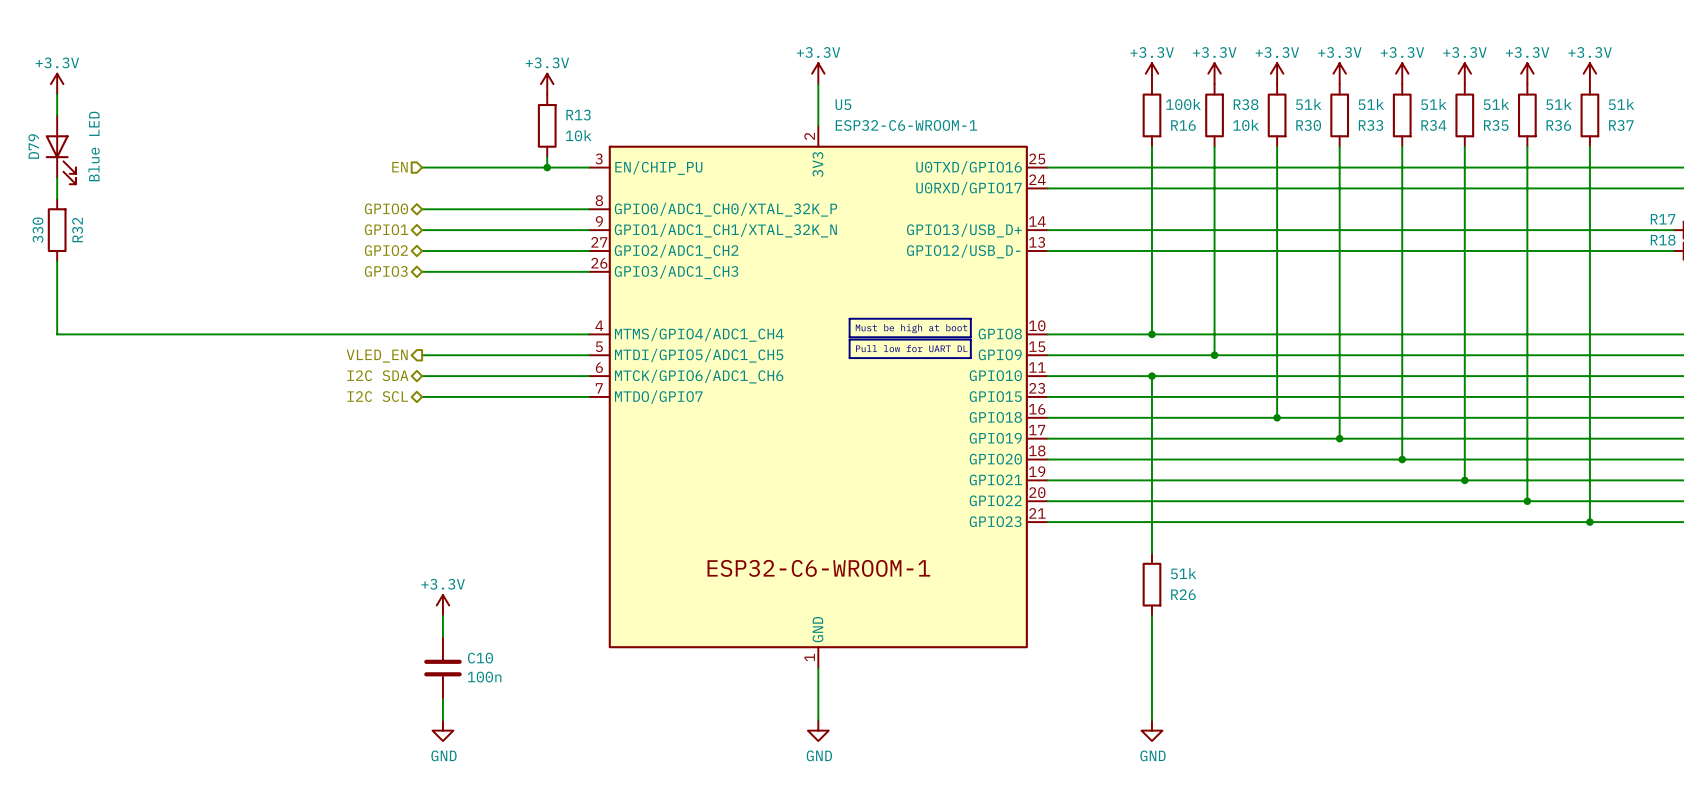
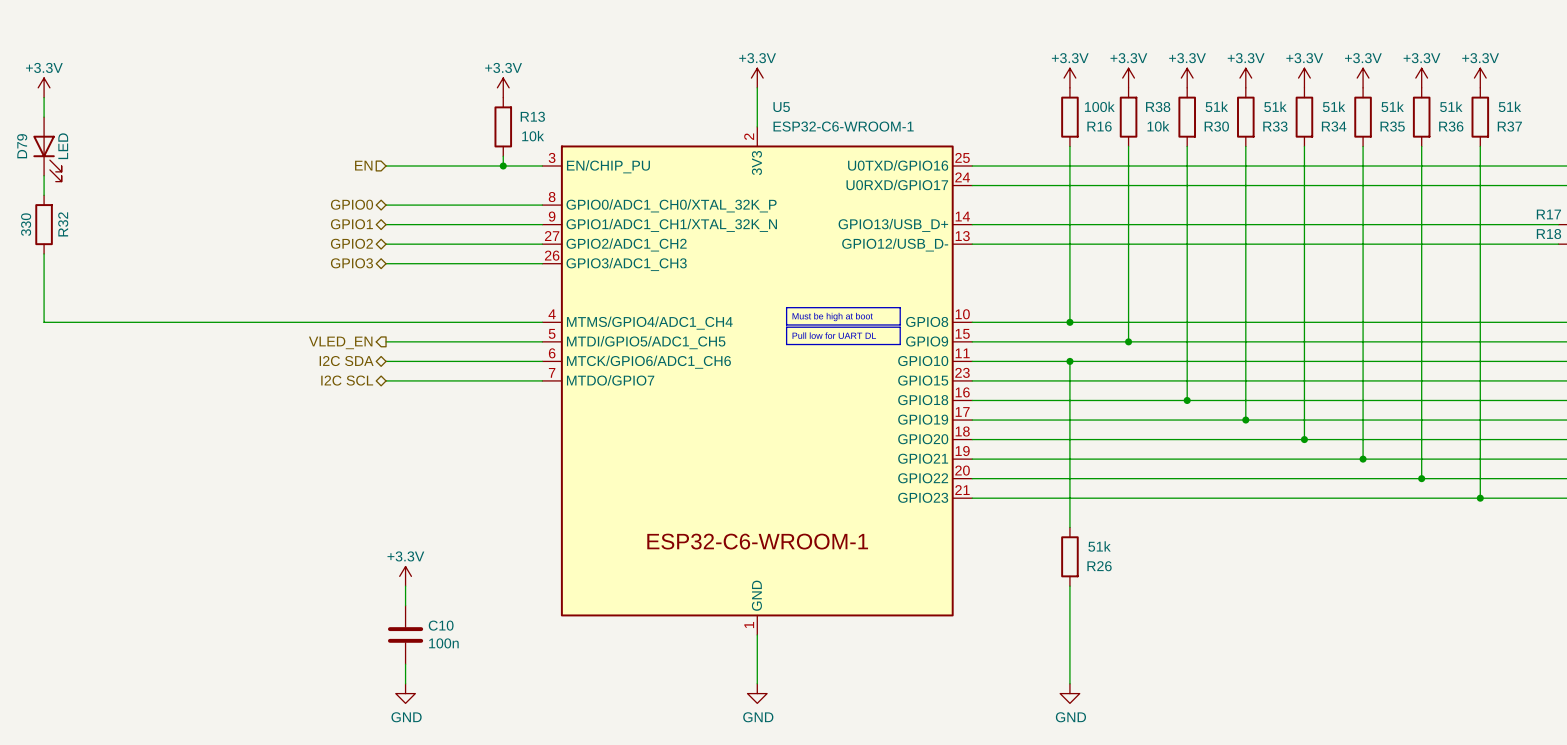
D79 value: Blue LED (94, 146) -> LED (63, 146)

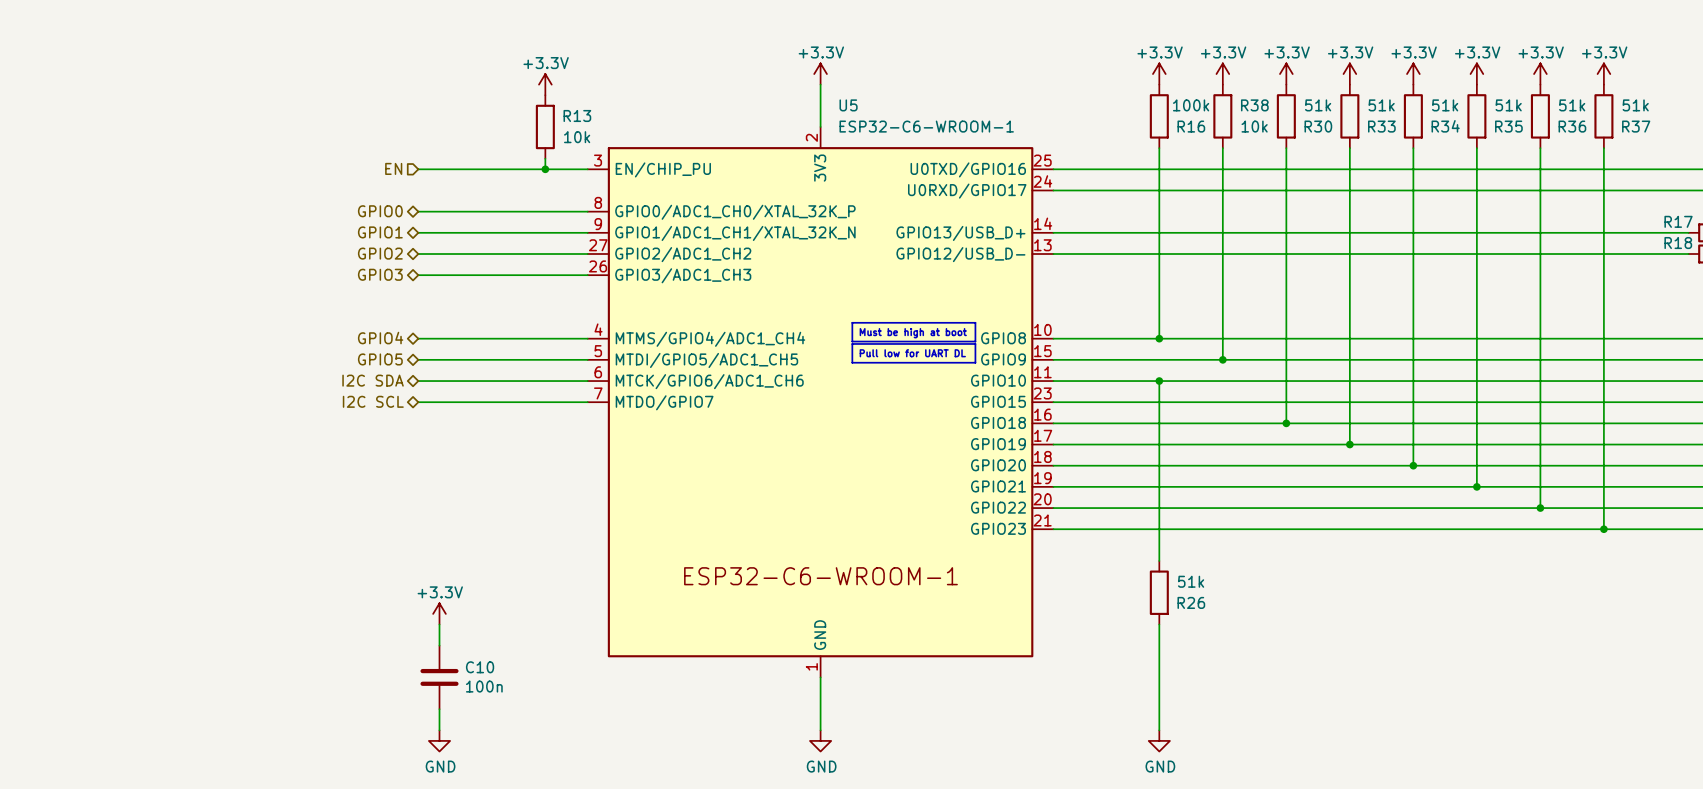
power symbol: +3.3V (44, 87) -> none
wire: (44, 97) (44, 117) -> none
D79: LED (47, 149) -> none
wire: (44, 175) (44, 195) -> none
R32: 330 (44, 224) -> none
wire: (44, 253) (44, 322) (386, 322) -> none
hierarchical label: none -> GPIO4 (380, 338)
hierarchical label shape: output (340, 342) -> bidirectional (380, 359)
hierarchical label: VLED_EN (340, 342) -> GPIO5 (380, 359)

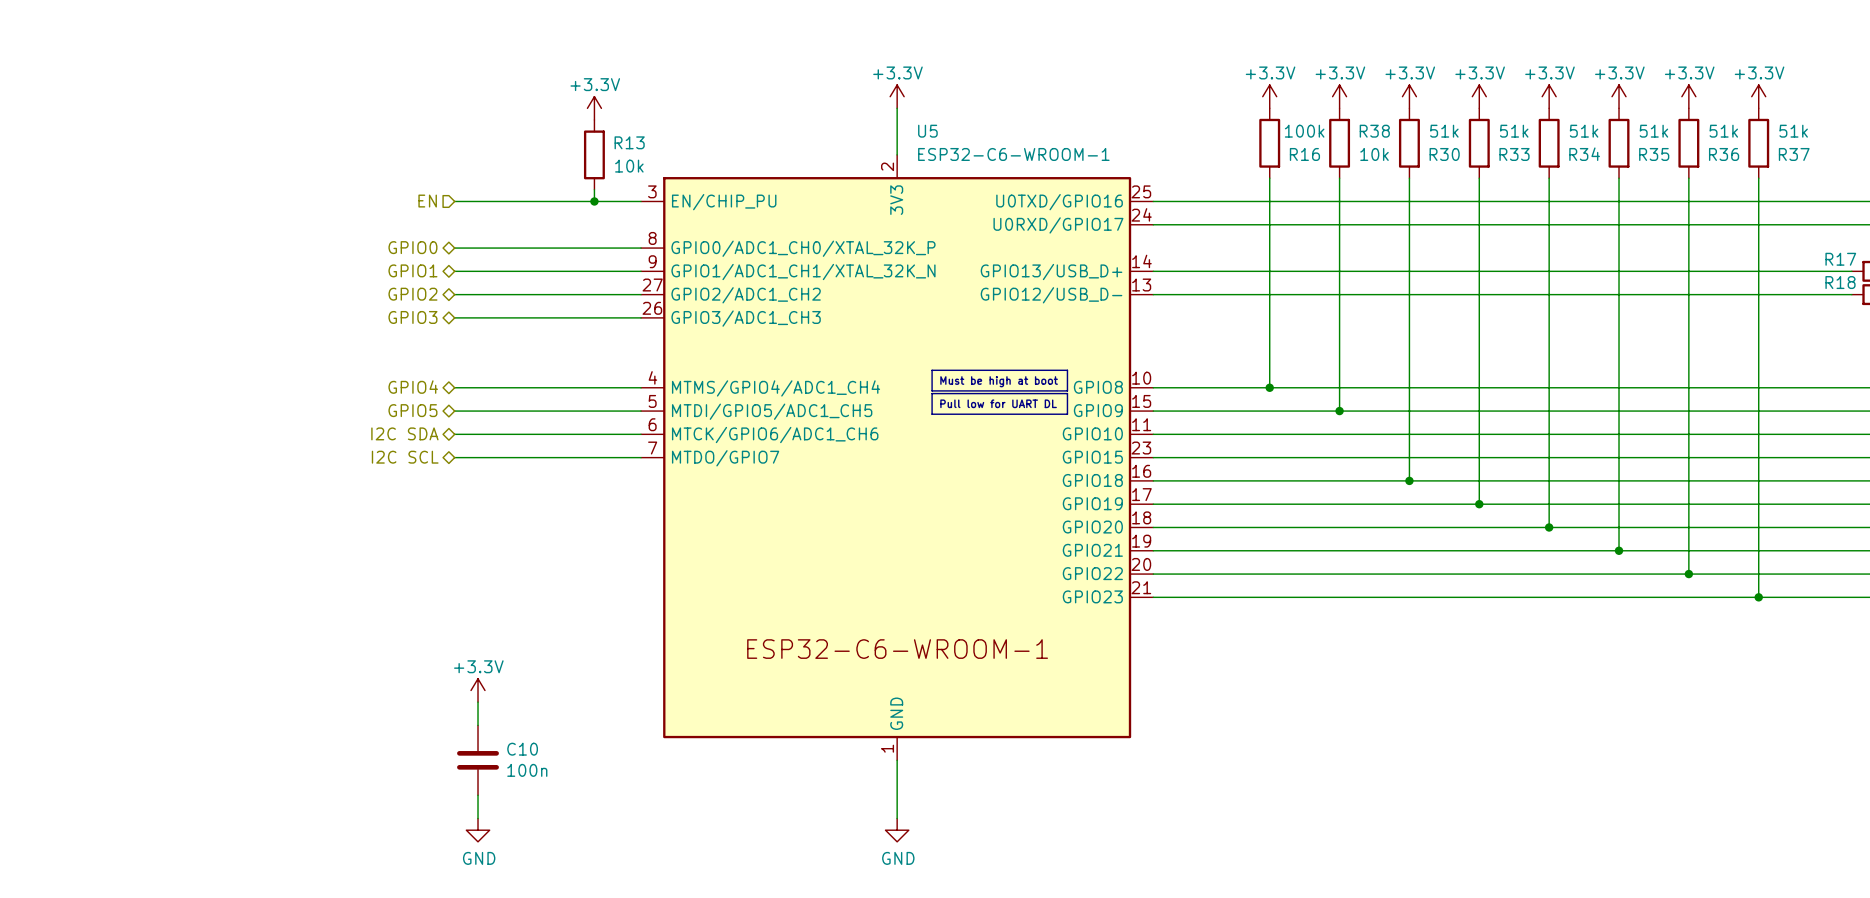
wire: (1159, 381) (1159, 560) -> none
junction: (1159, 381) -> none
R26: 51k (1159, 592) -> none
wire: (1159, 624) (1159, 730) -> none
power symbol: GND (1159, 740) -> none

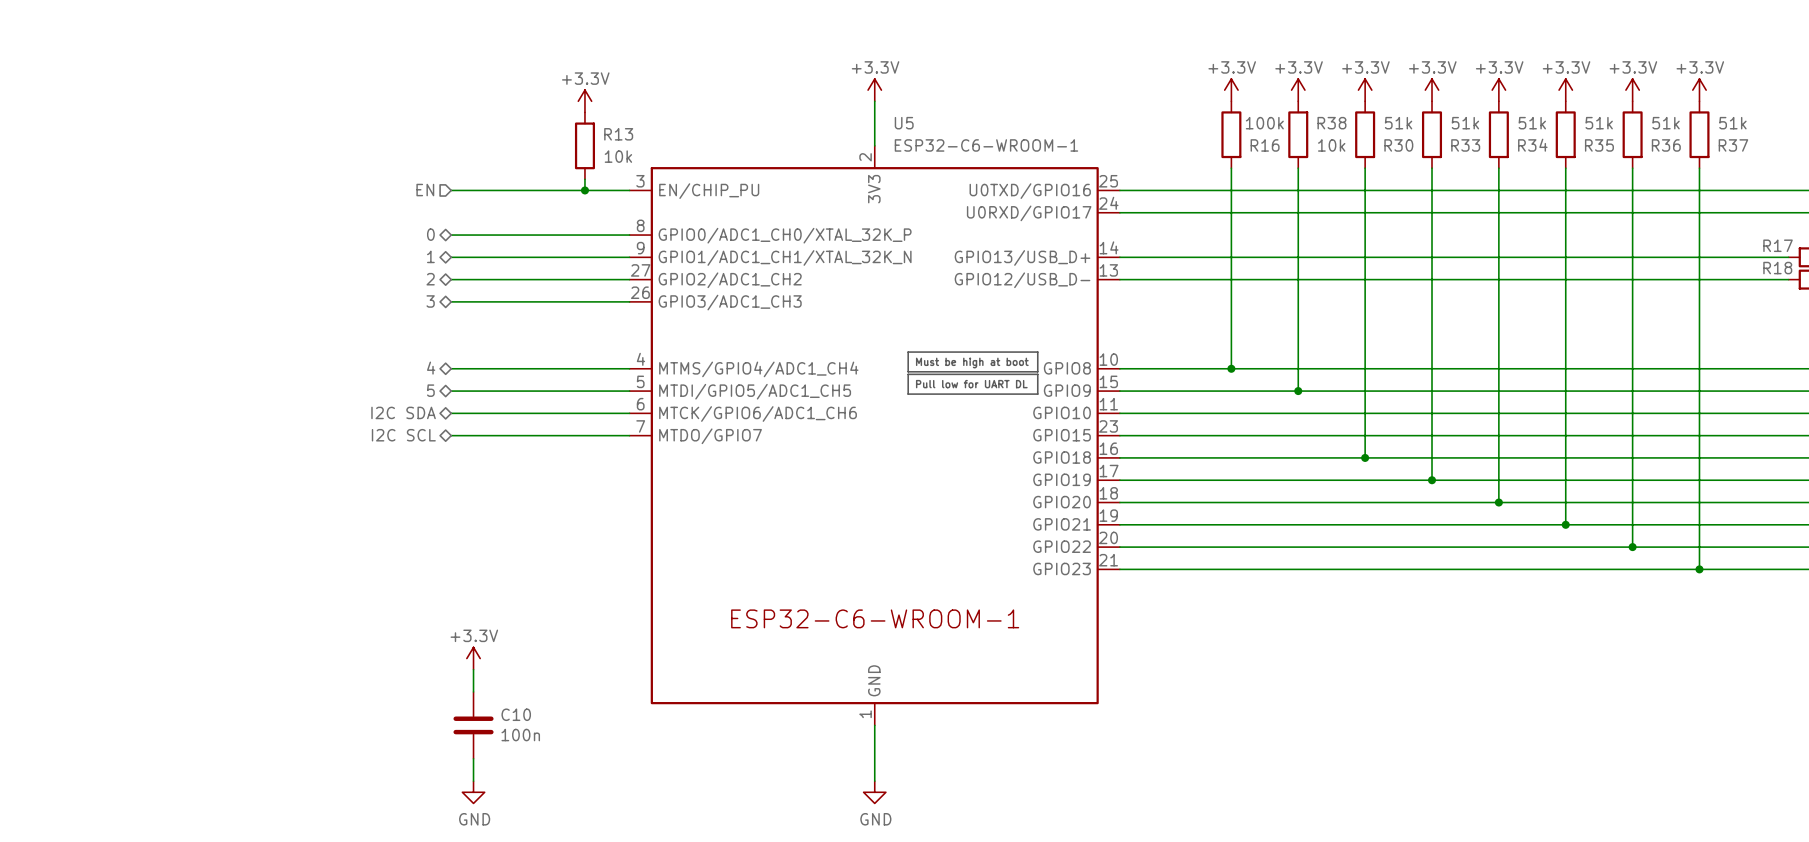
hierarchical label: GPIO0 (412, 247) -> 0 (430, 234)
hierarchical label: GPIO1 (412, 270) -> 1 (430, 256)
hierarchical label: GPIO2 (412, 294) -> 2 (430, 279)
hierarchical label: GPIO3 (412, 317) -> 3 (430, 301)
hierarchical label: GPIO4 (413, 387) -> 4 (431, 368)
hierarchical label: GPIO5 (412, 410) -> 5 (430, 390)

